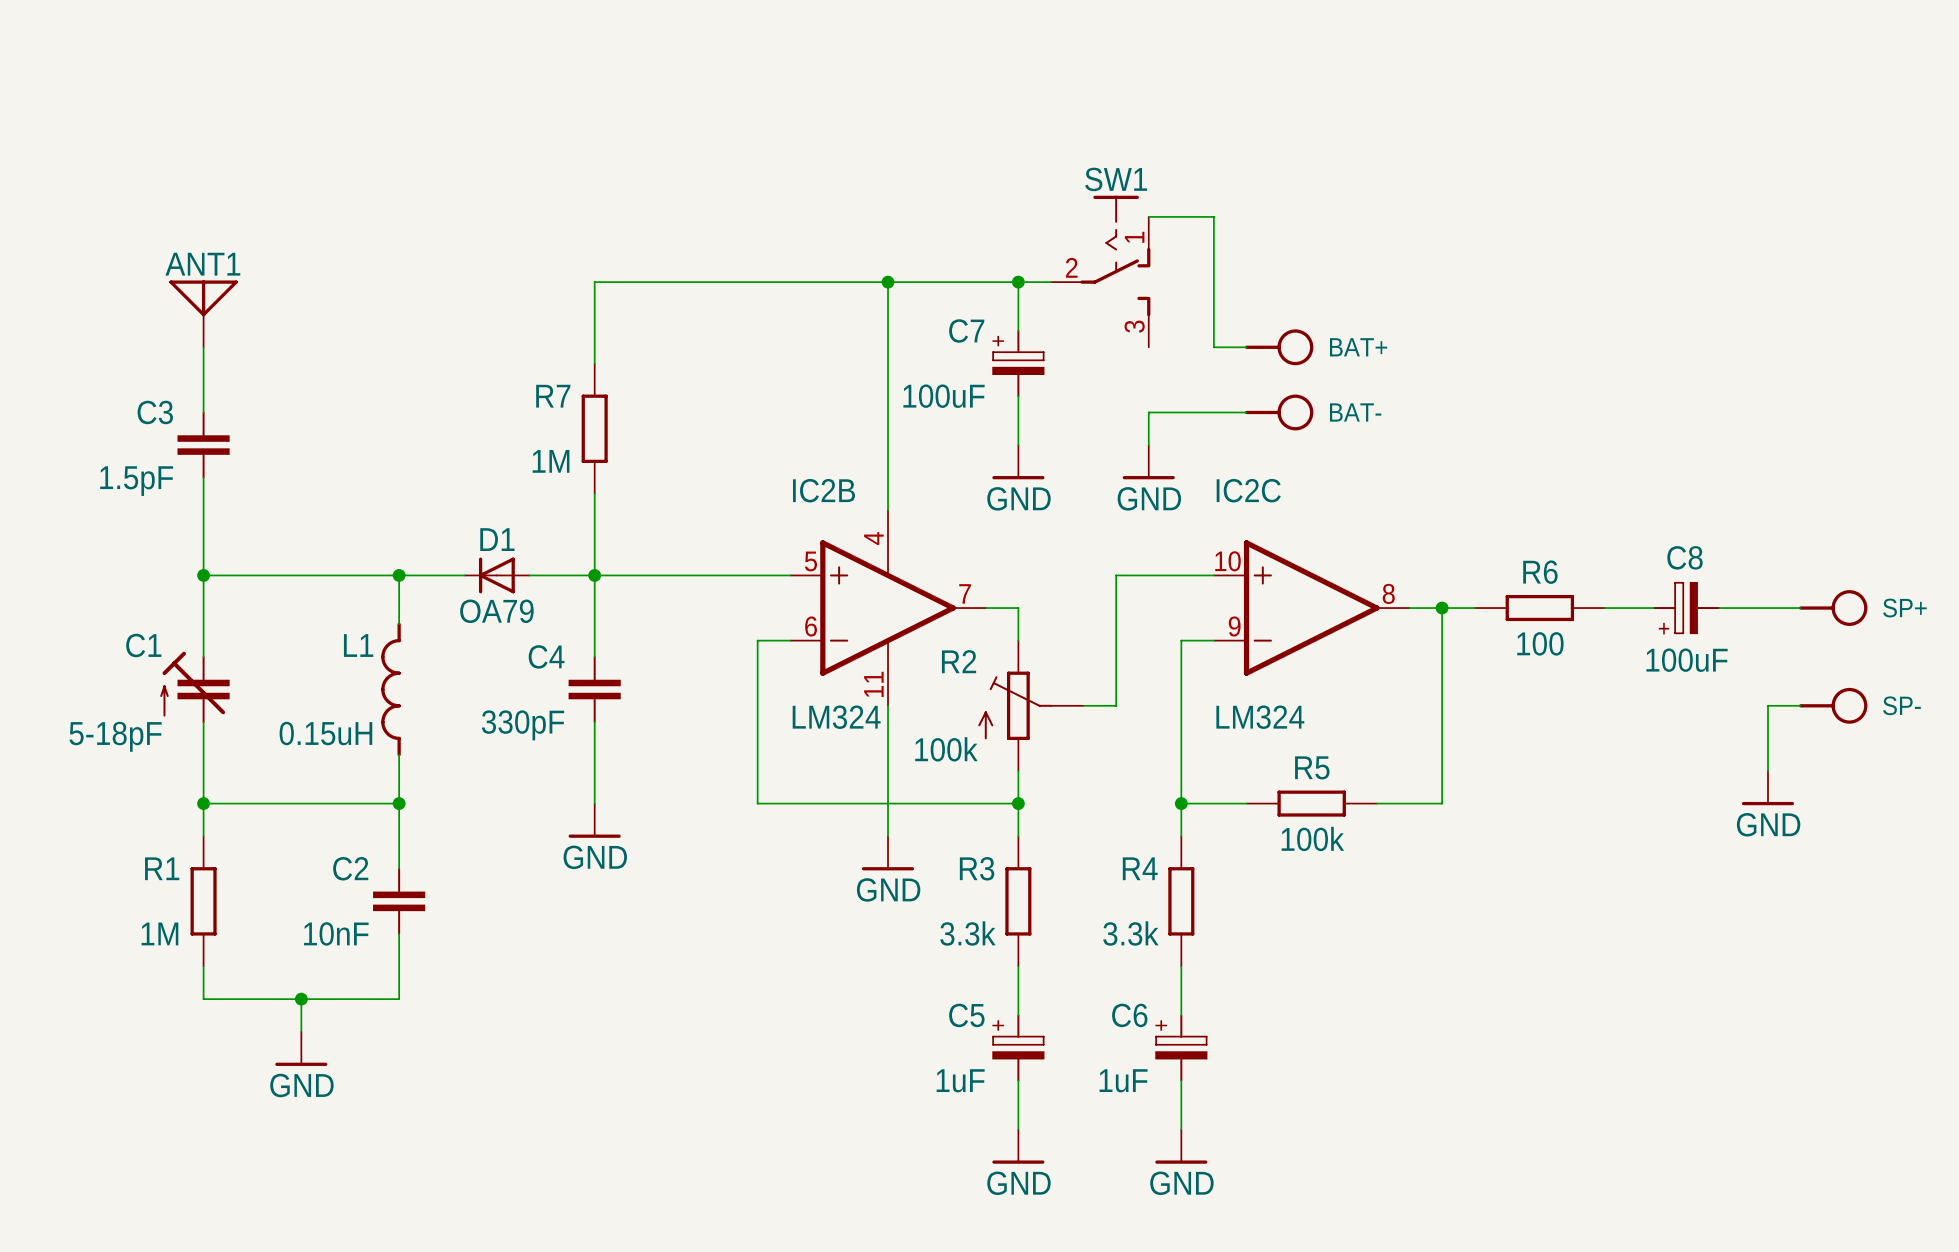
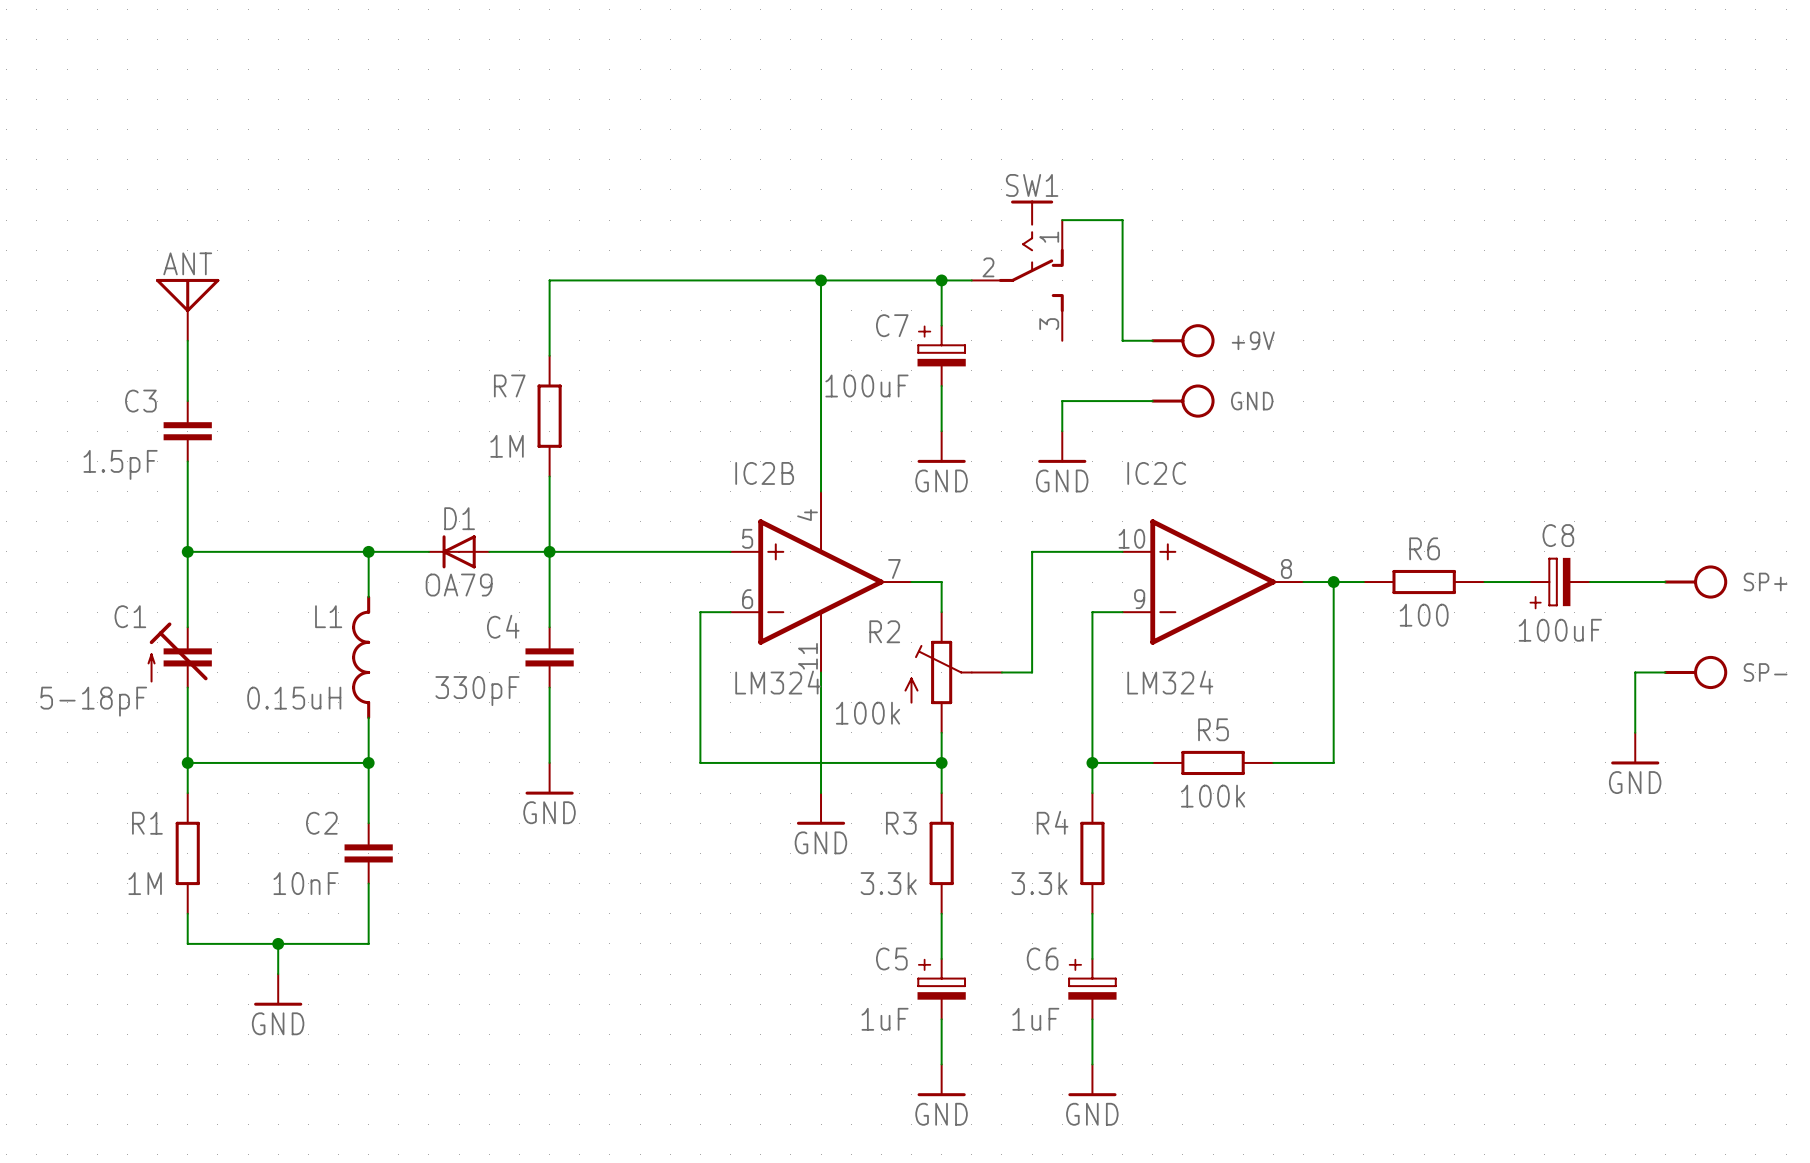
ANT1 name: ANT1 (202, 264) -> ANT (187, 263)
BAT+ name: BAT+ (1358, 347) -> +9V (1253, 340)
BAT- name: BAT- (1355, 412) -> GND (1252, 401)

